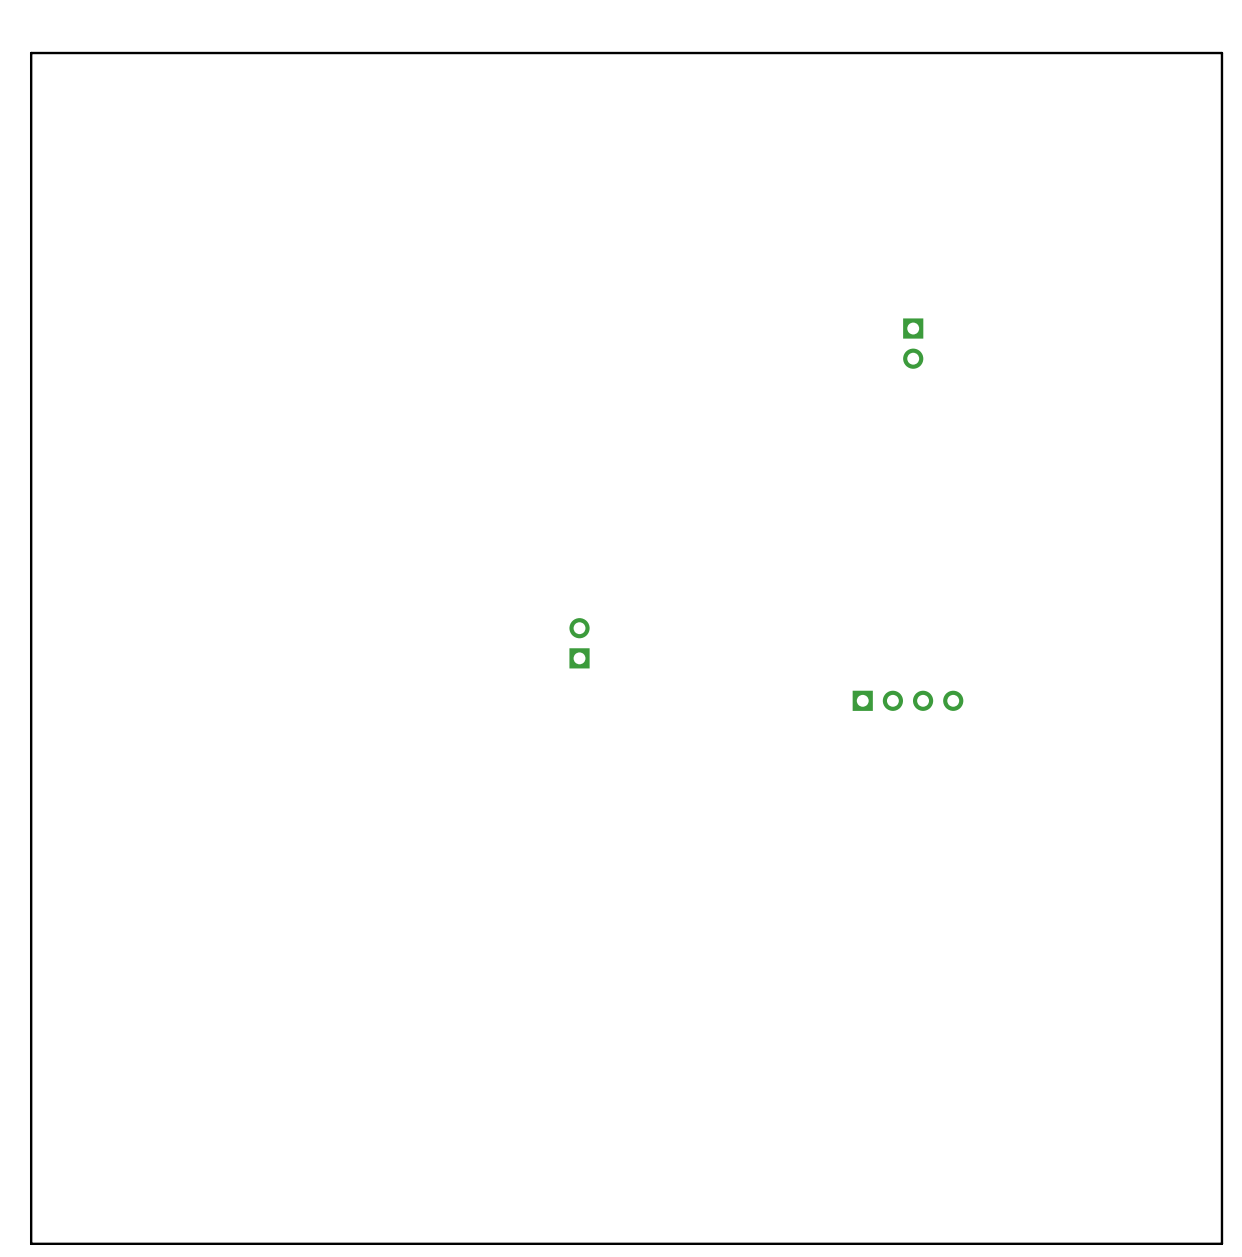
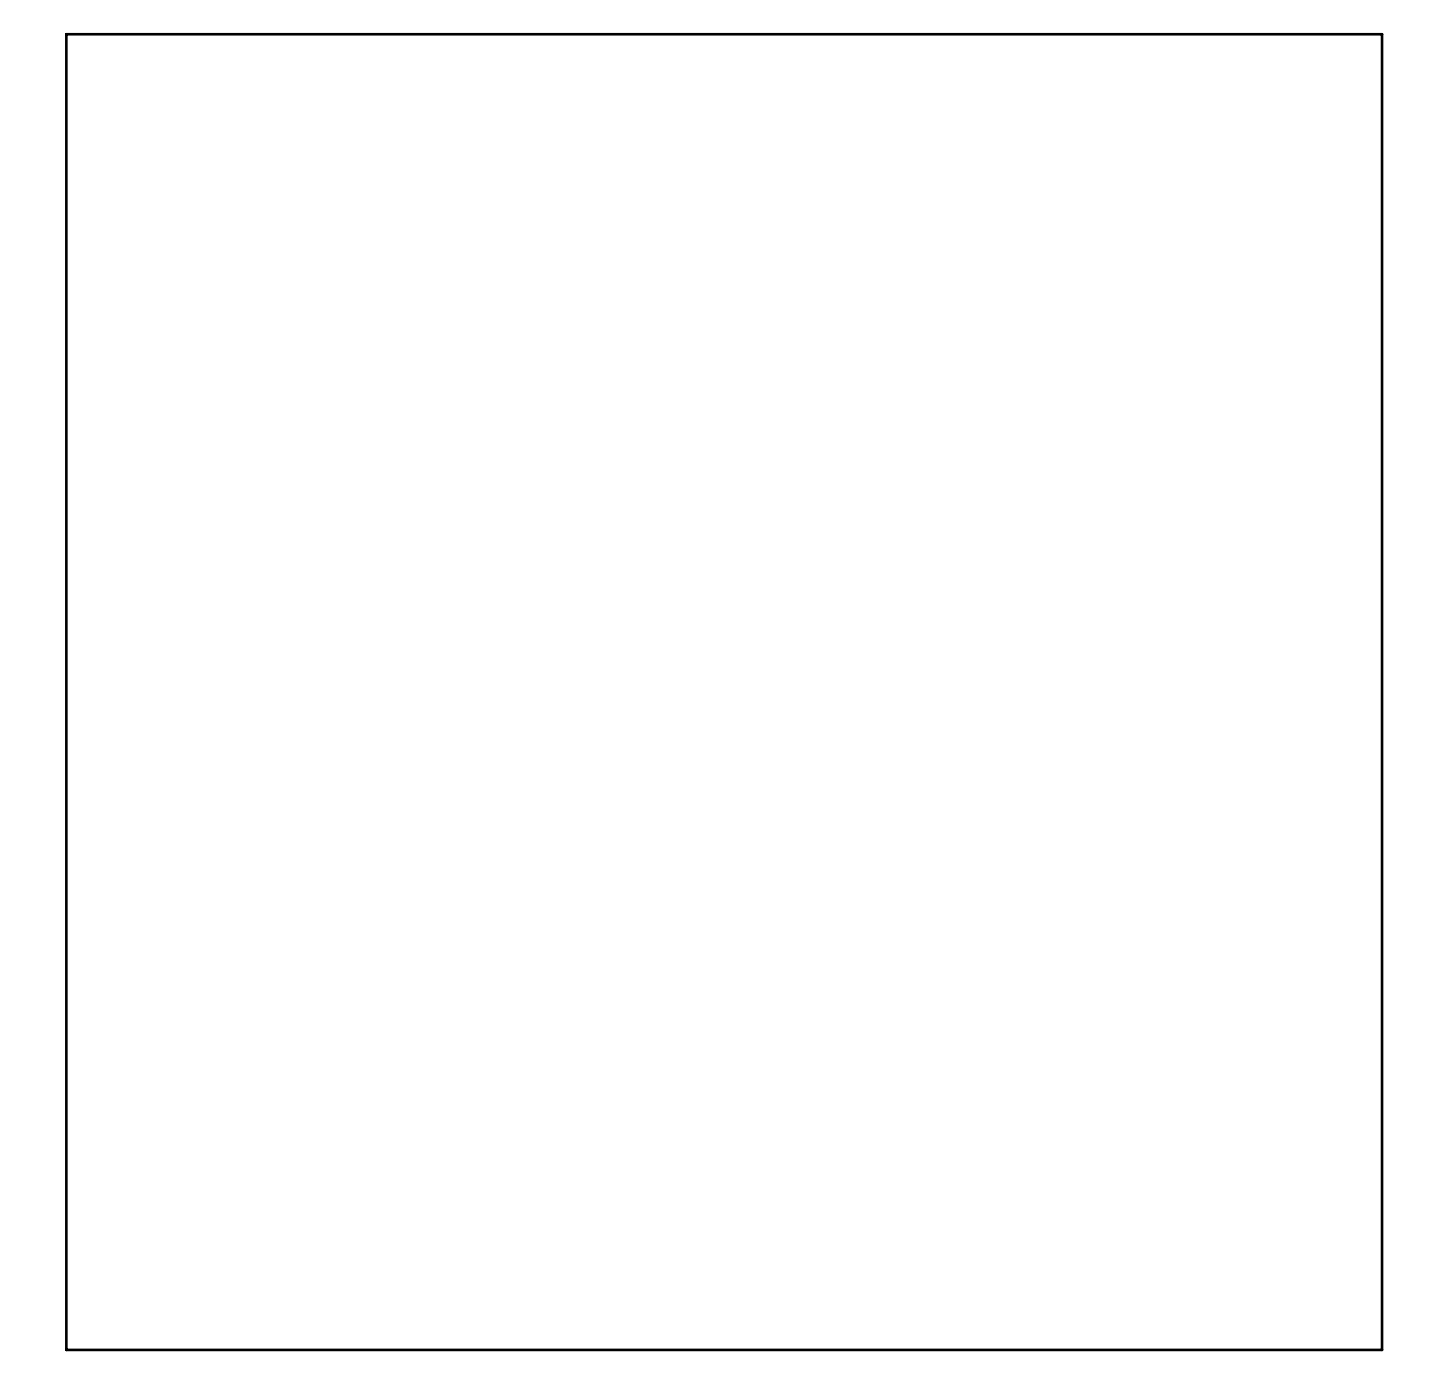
part: (913, 343) -> none
part: (579, 643) -> none
part: (907, 700) -> none

